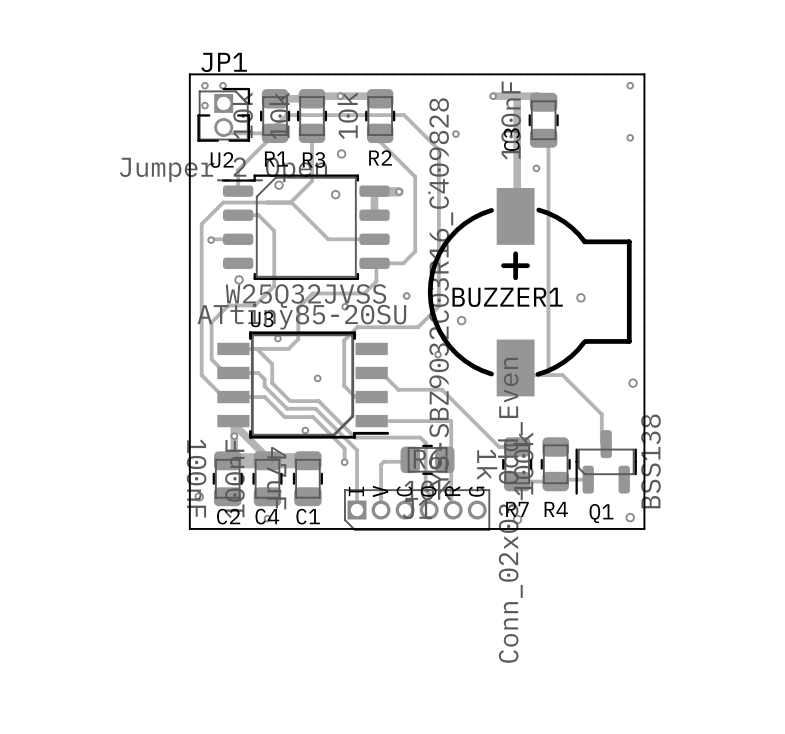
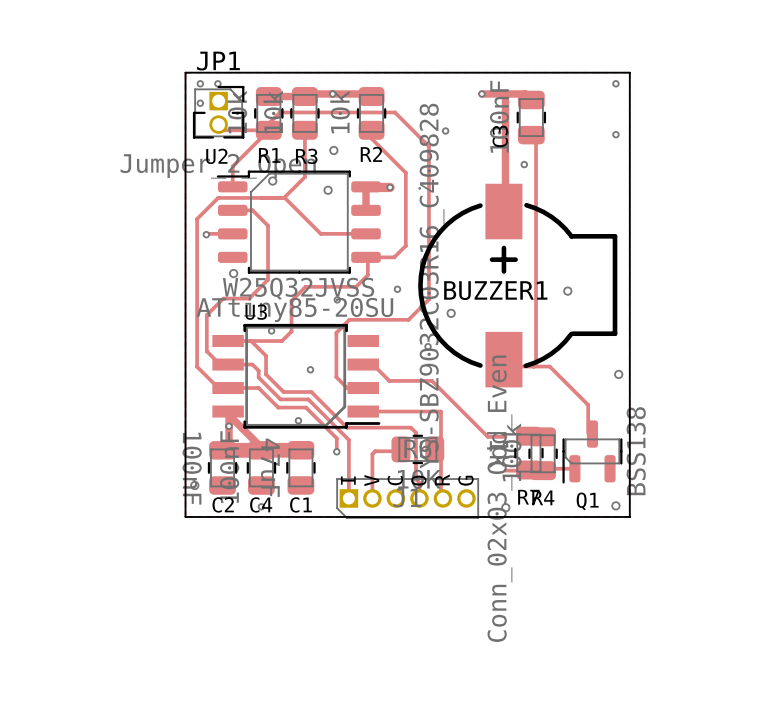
R7 position: (517, 464) -> (528, 453)

